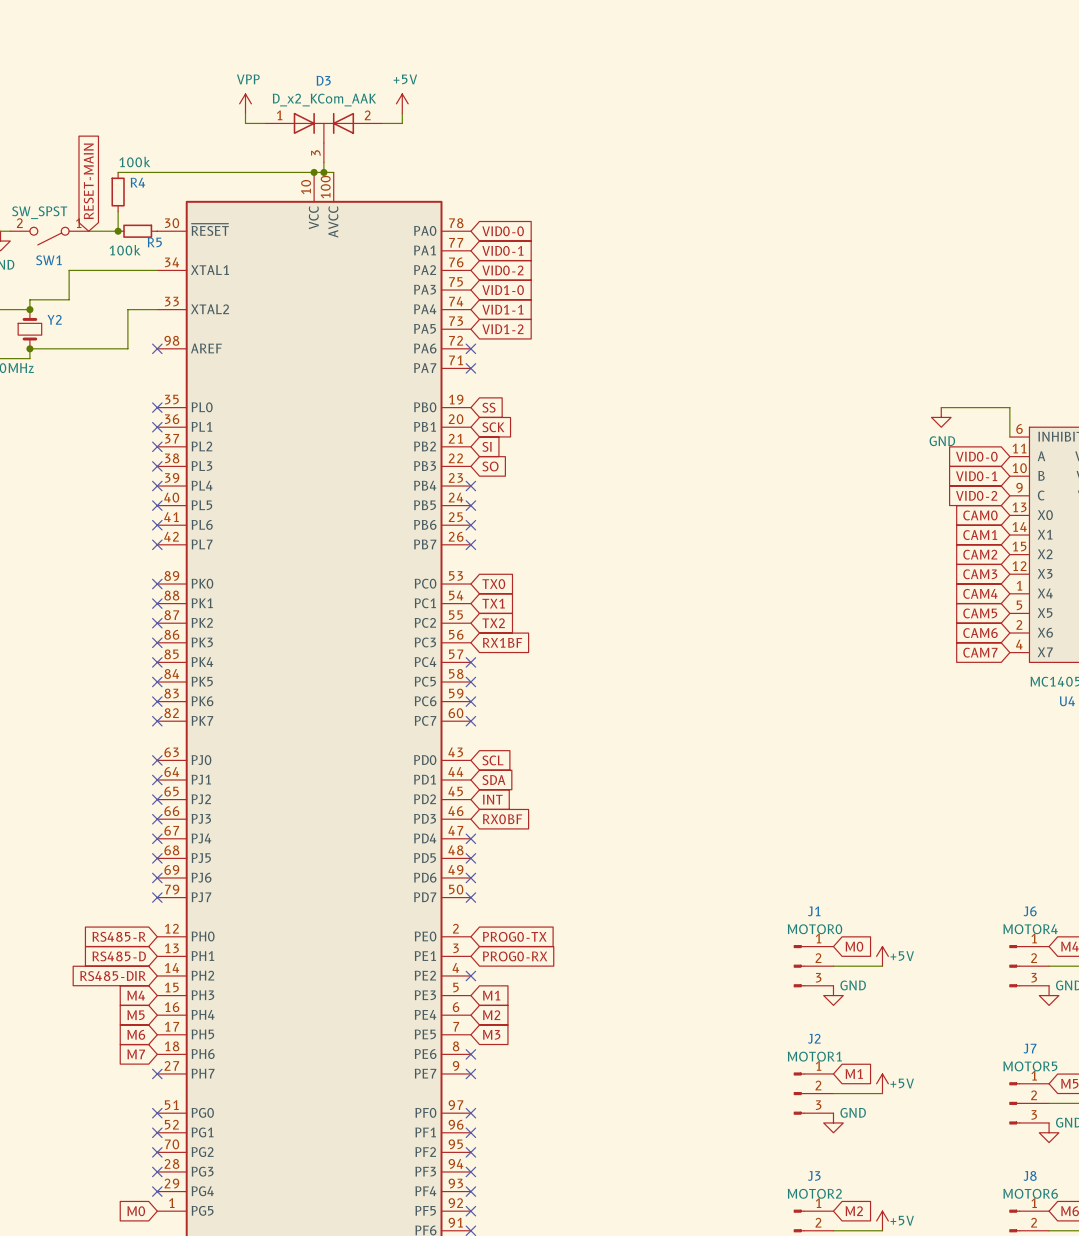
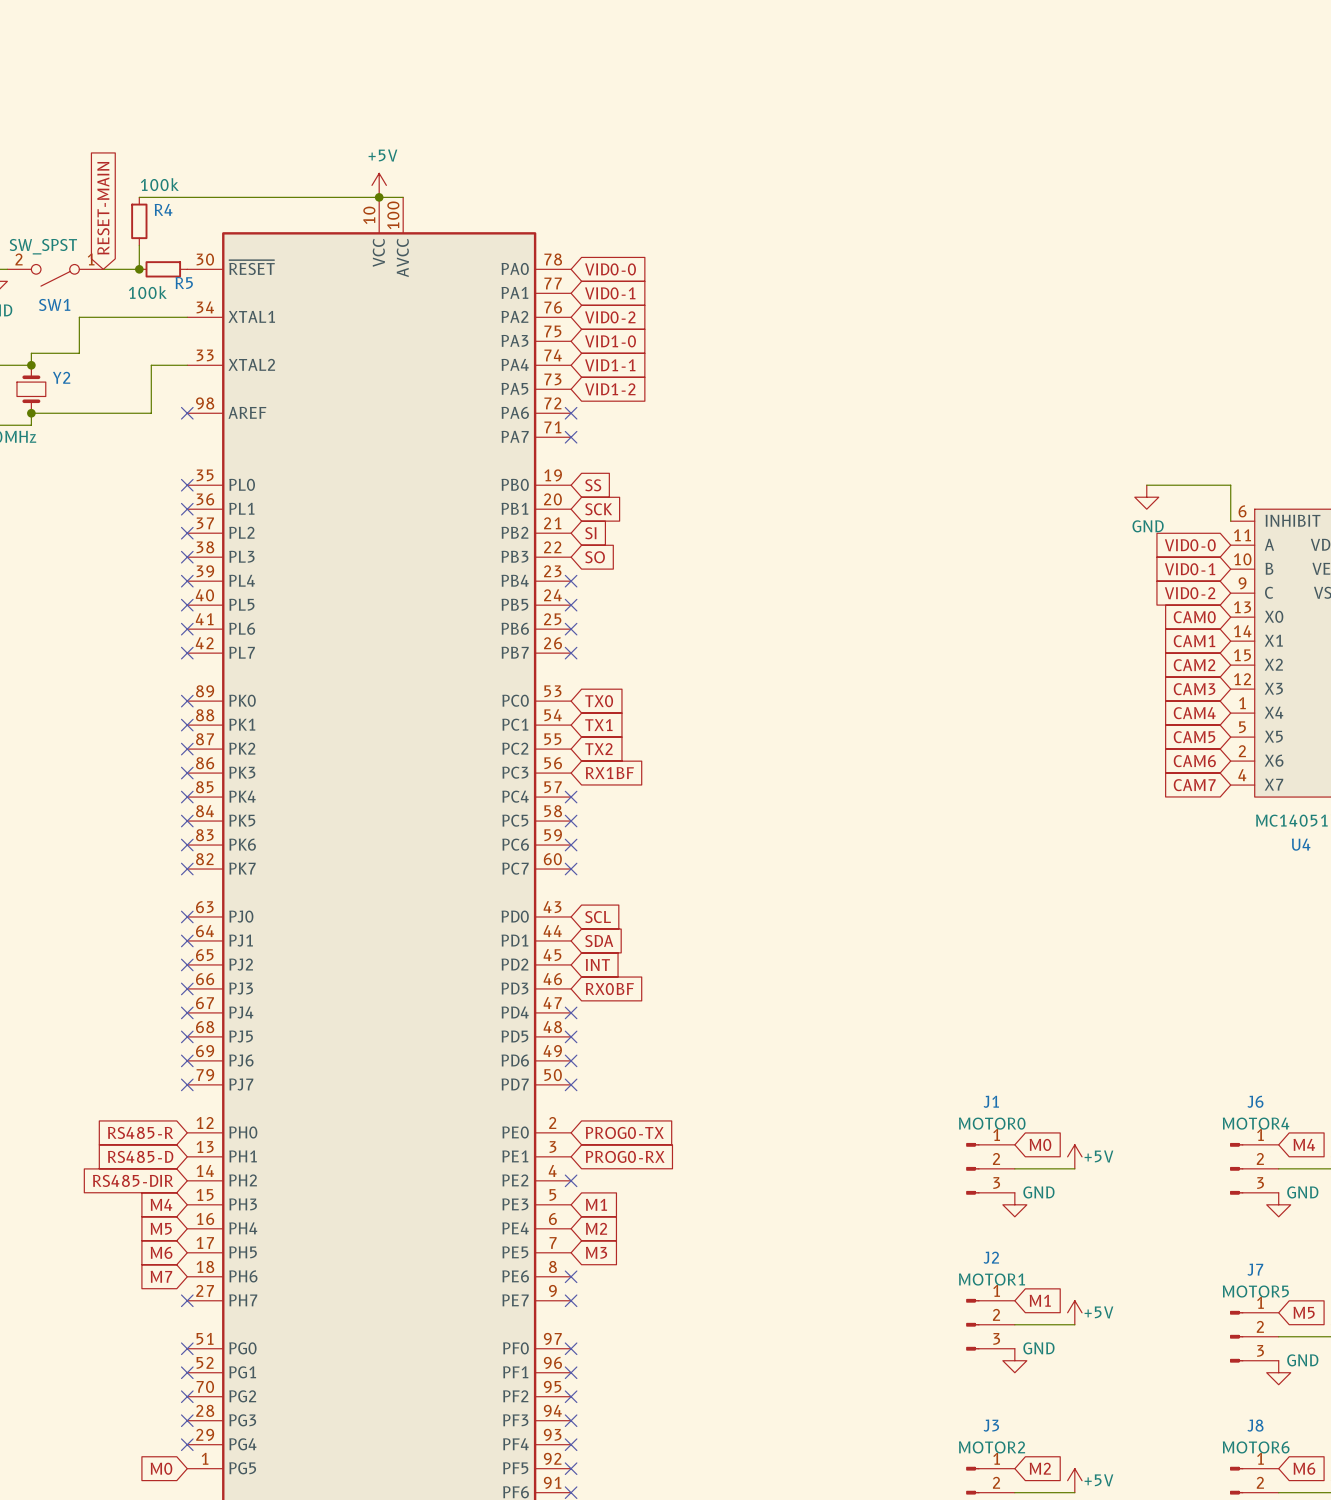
power symbol: VPP (245, 103) -> none
power symbol position: +5V (402, 103) -> +5V (379, 185)
wire: (245, 113) (245, 123) (265, 123) -> none
wire: (402, 113) (402, 123) (382, 123) -> none
D3: D_x2_KCom_AAK (323, 137) -> none
wire: (323, 162) (323, 172) -> none
junction: (323, 172) -> none

